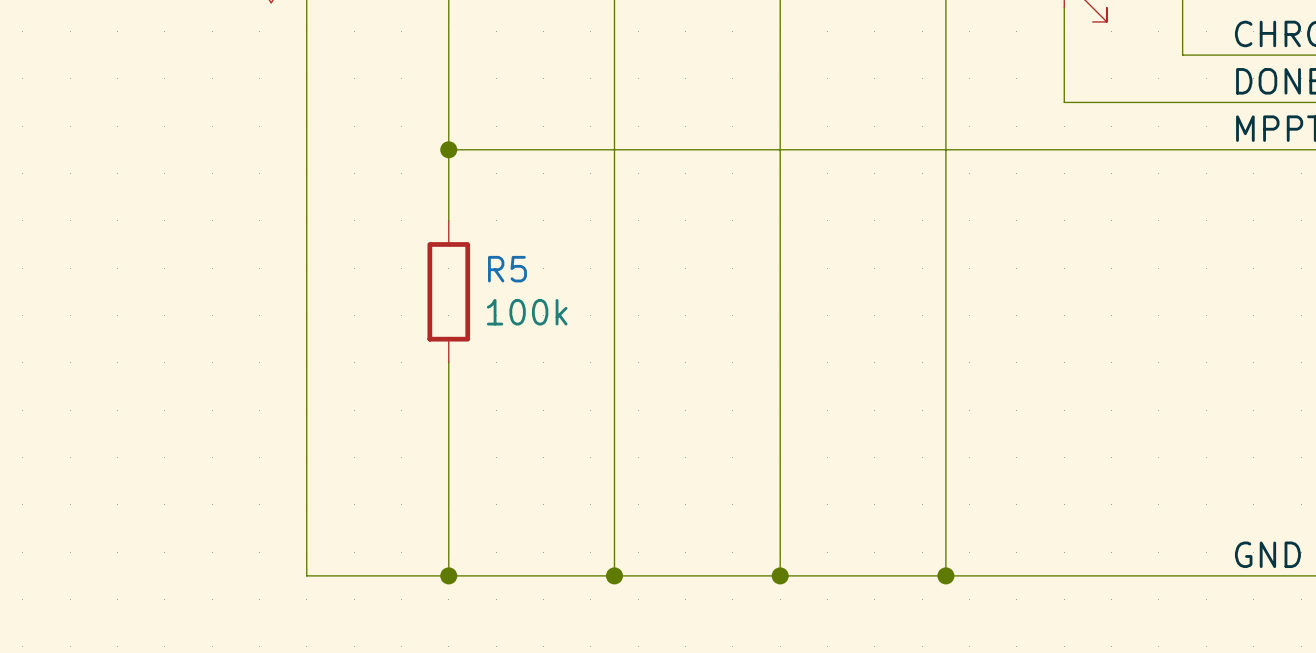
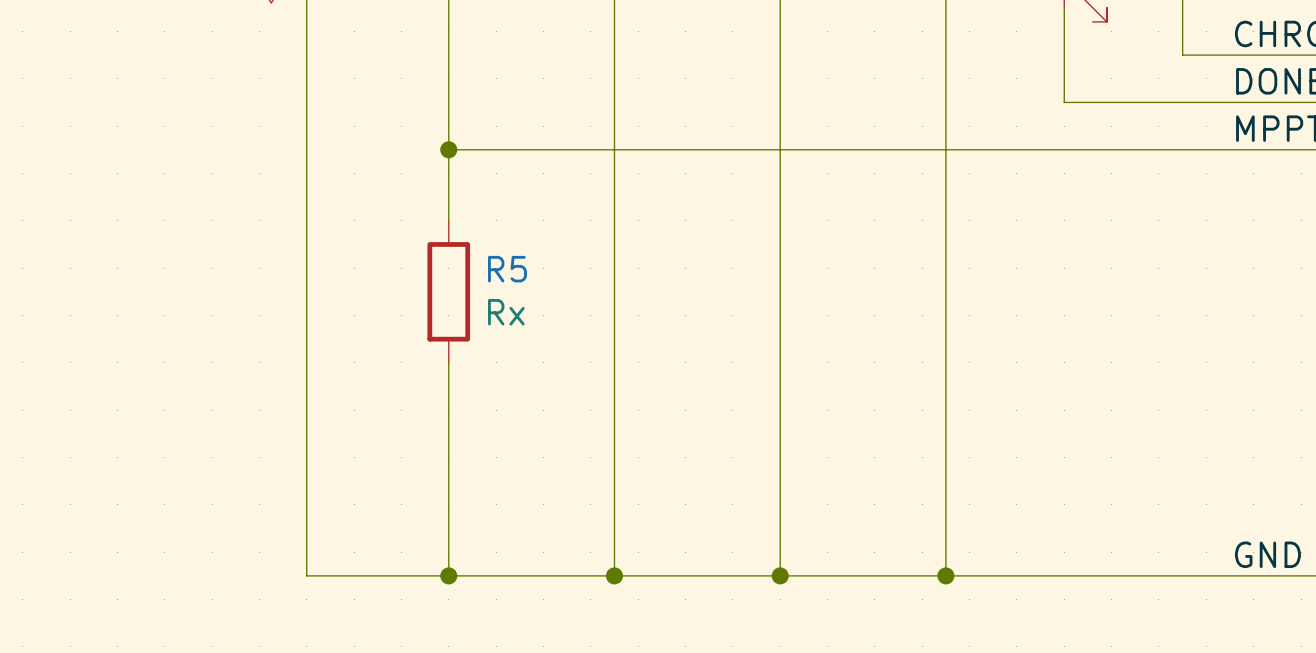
R5 value: 100k (527, 312) -> Rx (506, 312)

